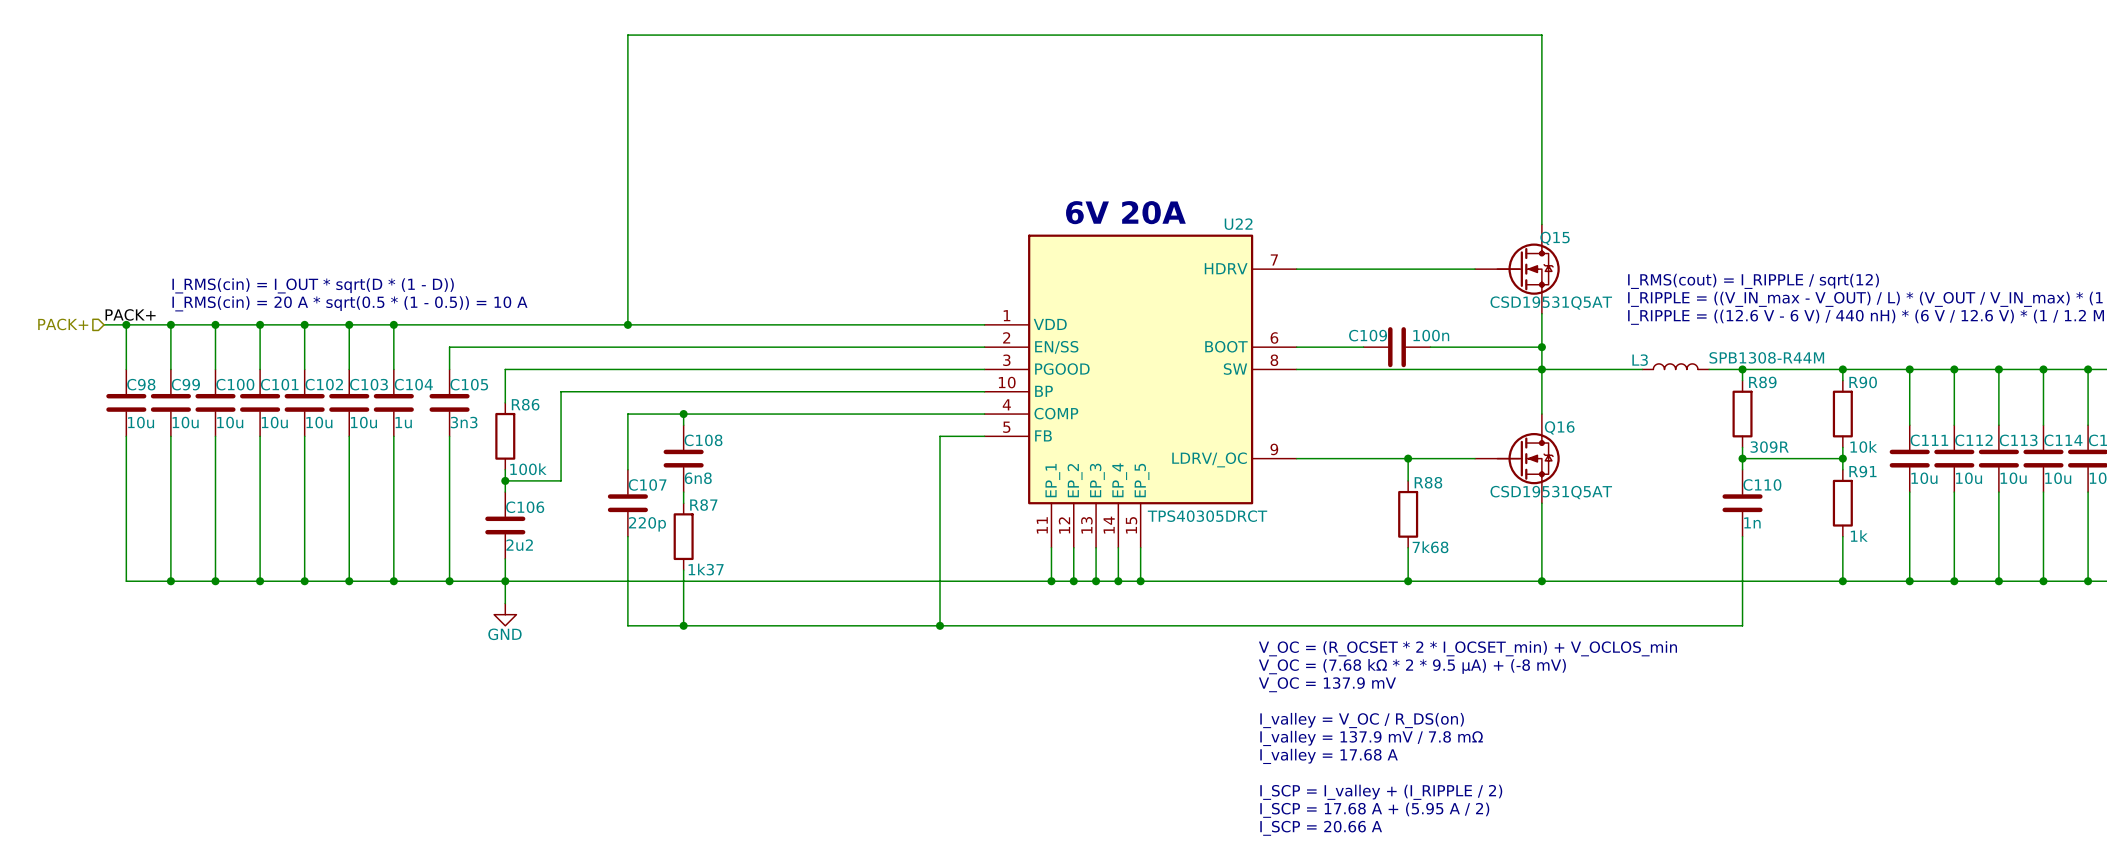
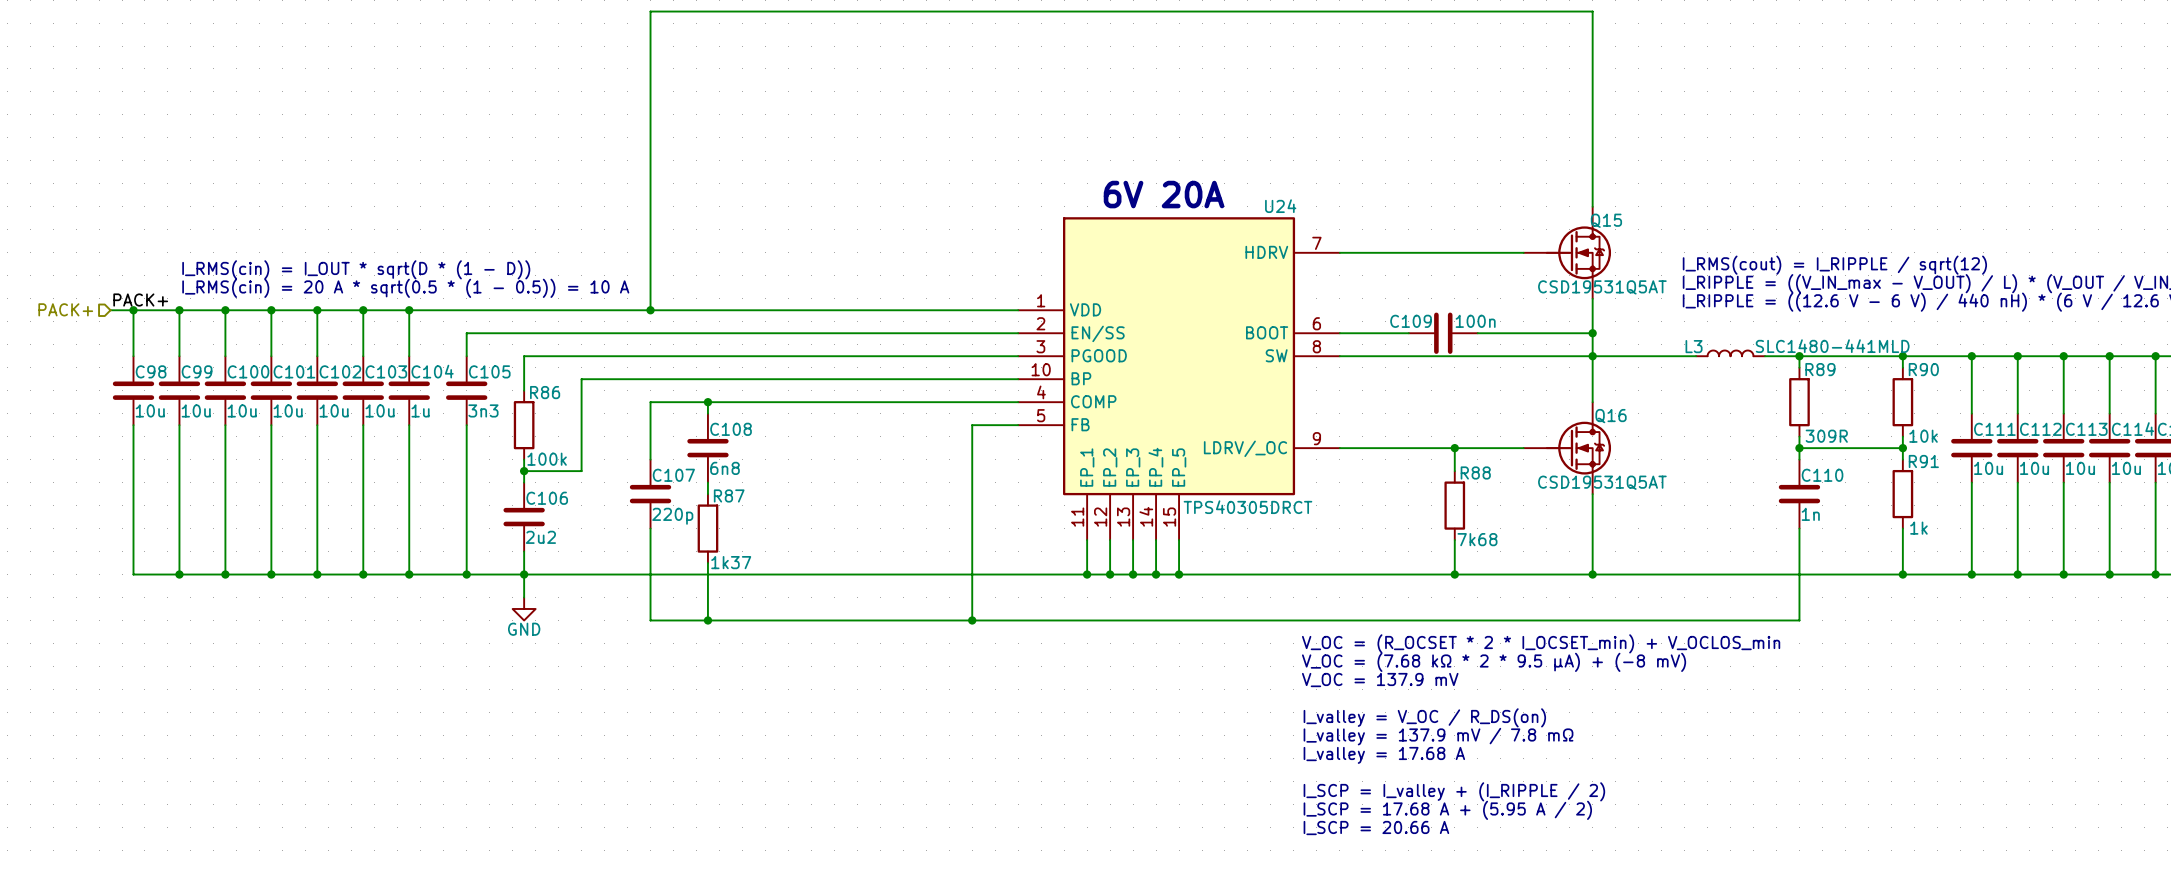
U22 name: U22 (1238, 224) -> U24 (1280, 206)
L3 value: SPB1308-R44M (1766, 357) -> SLC1480-441MLD (1832, 346)

